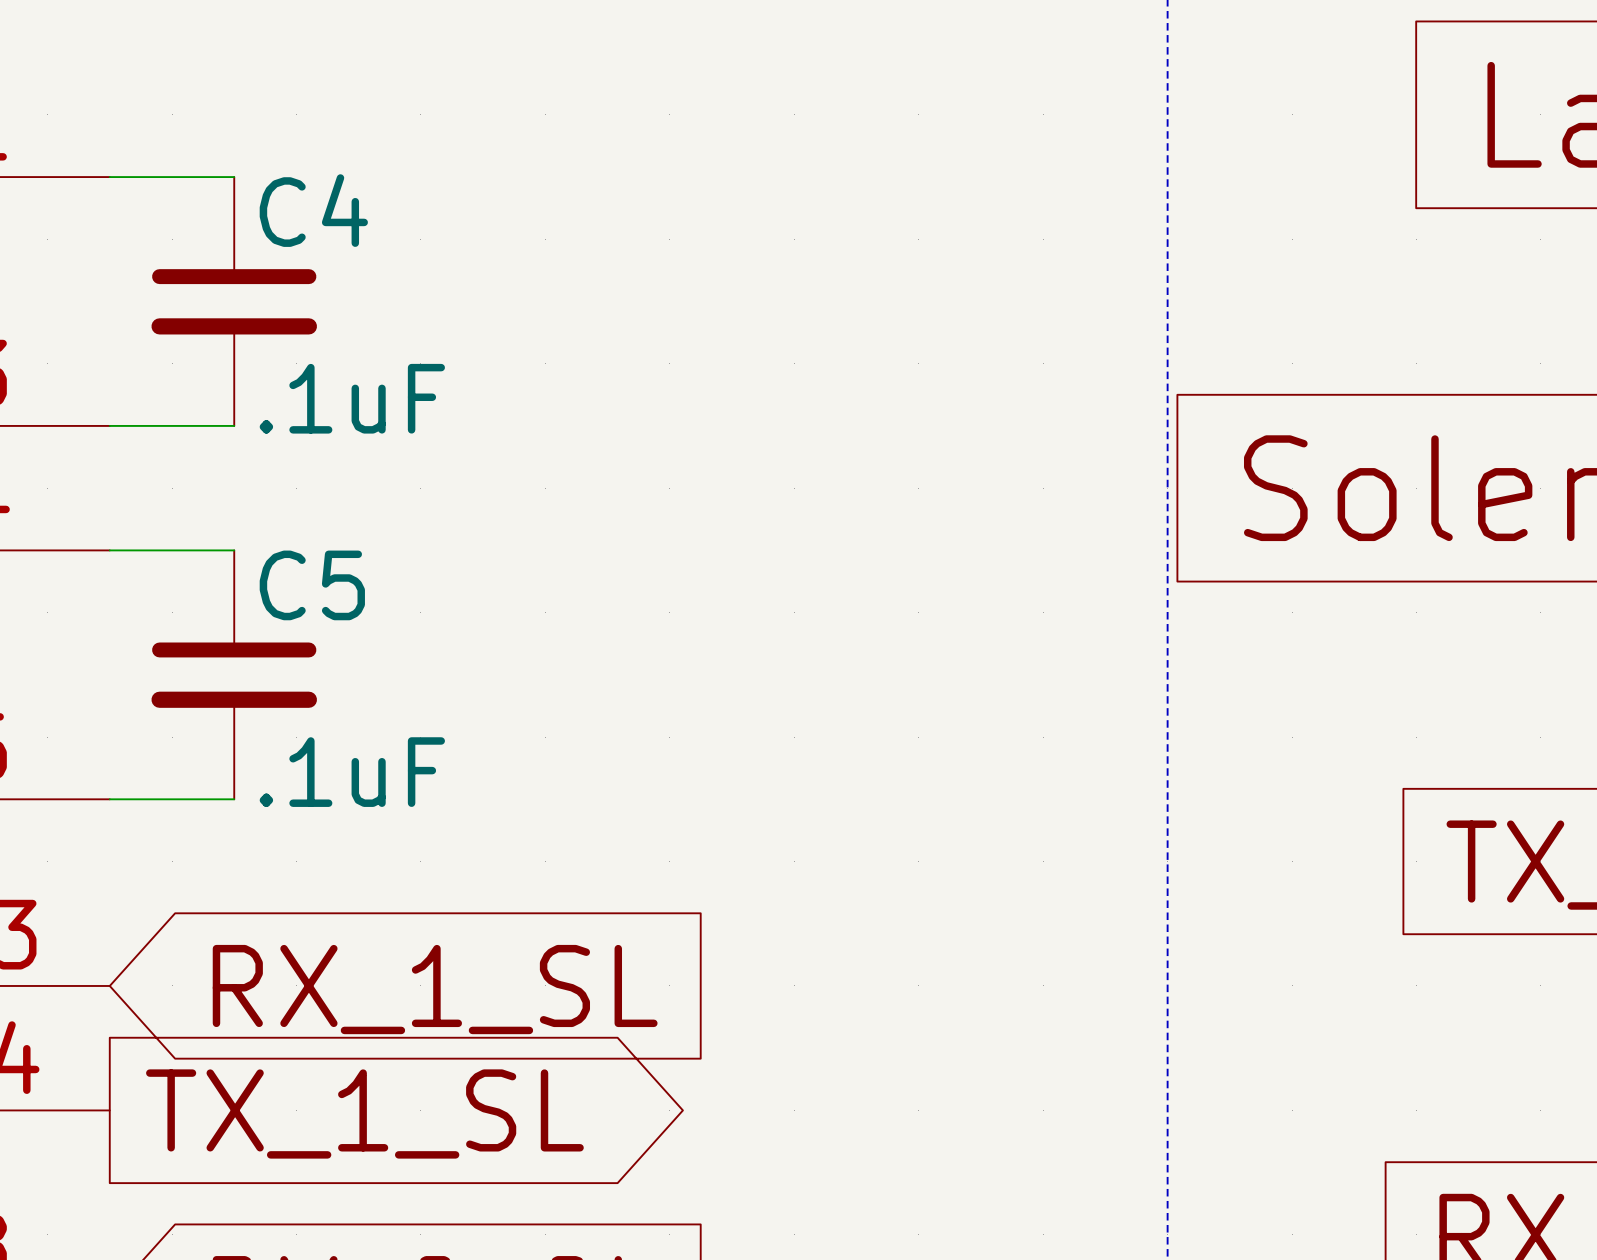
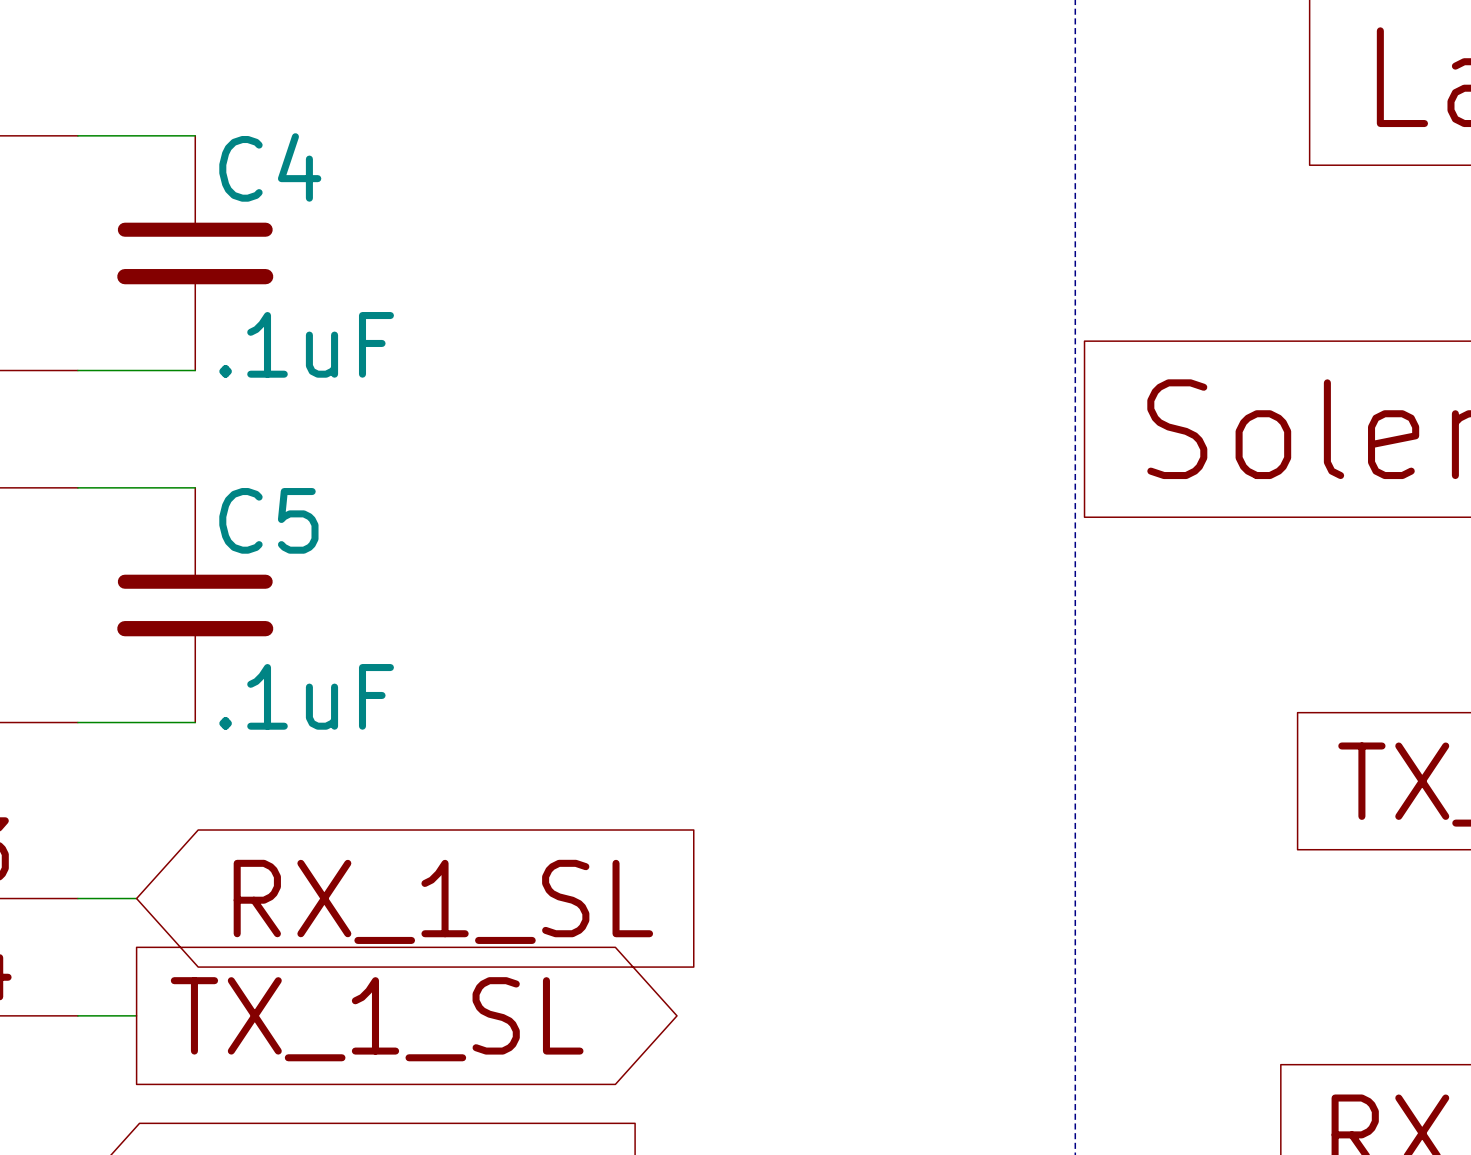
wire: none -> (77, 898) (136, 898)
global label position: RX_1_SL (435, 989) -> RX_1_SL (443, 901)
wire: none -> (77, 1015) (136, 1015)
global label position: TX_1_SL (364, 1113) -> TX_1_SL (377, 1019)

